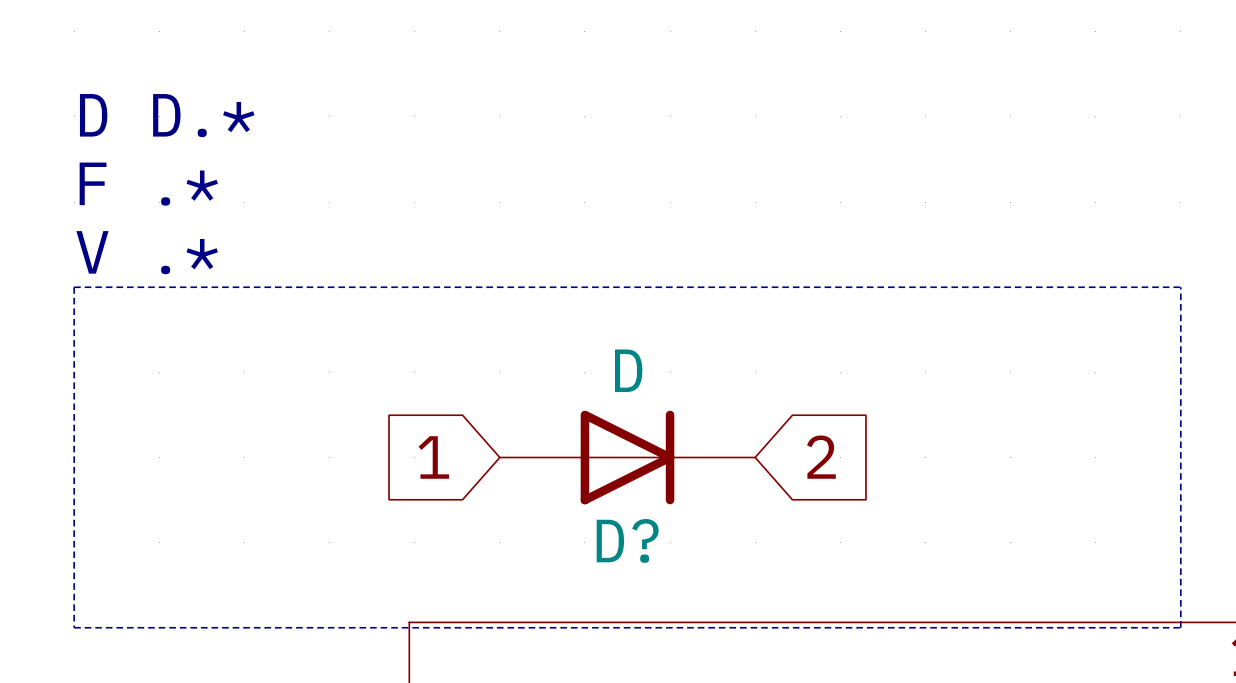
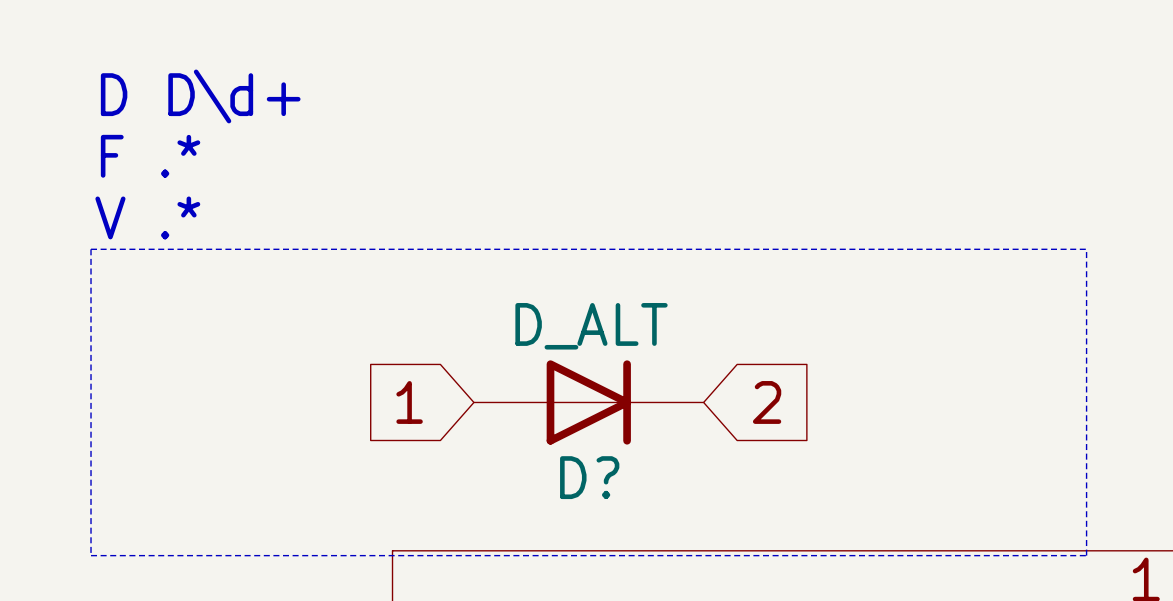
text: D D.* (167, 115) -> D D\d+ (200, 96)
D? value: D (628, 370) -> D_ALT (591, 326)

